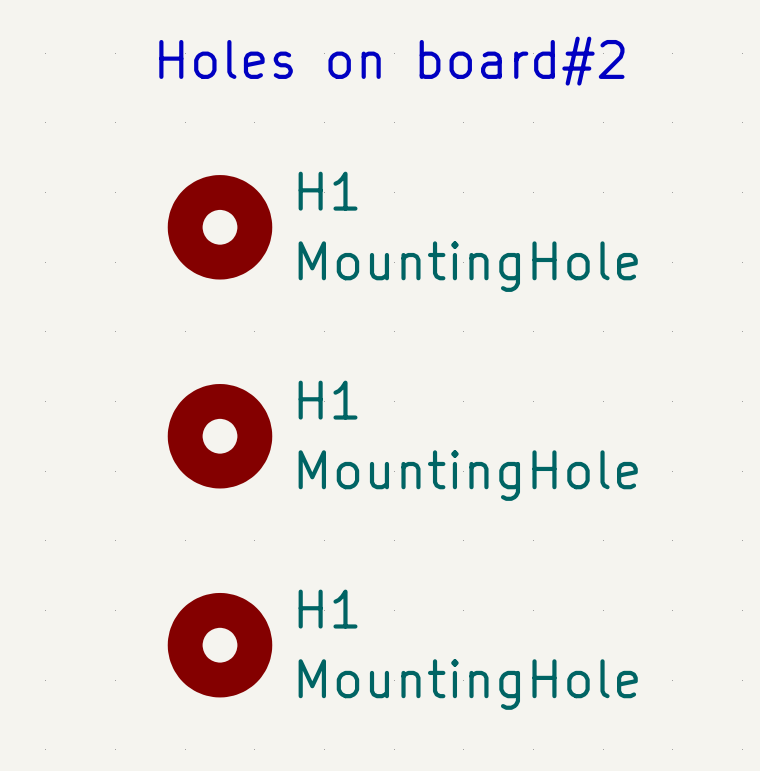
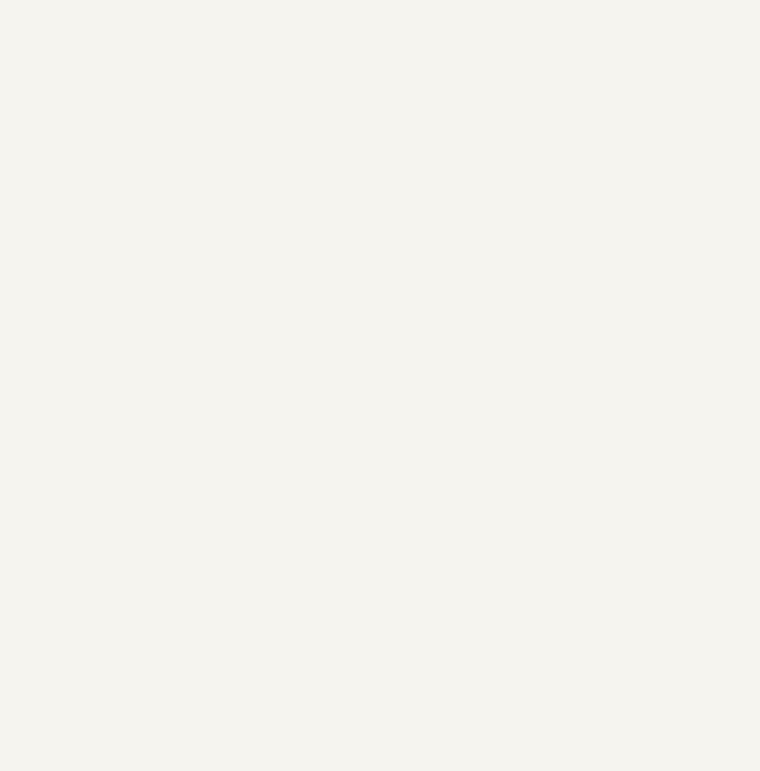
text: Holes on board#2 (391, 61) -> none
H1: MountingHole (220, 227) -> none
H1: MountingHole (220, 436) -> none
H1: MountingHole (220, 645) -> none

